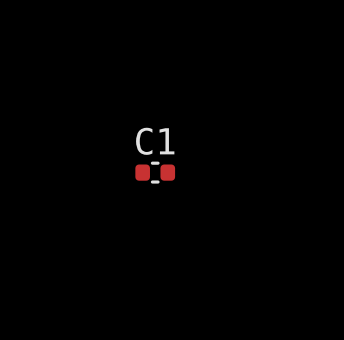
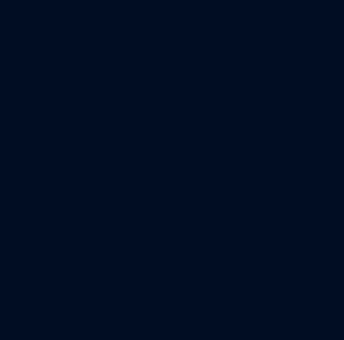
C1: (155, 172) -> none

